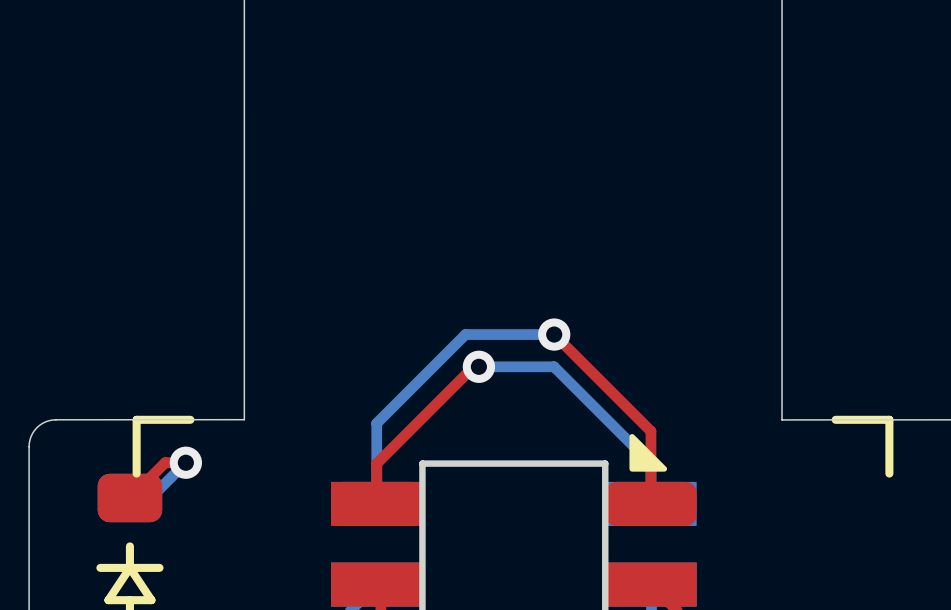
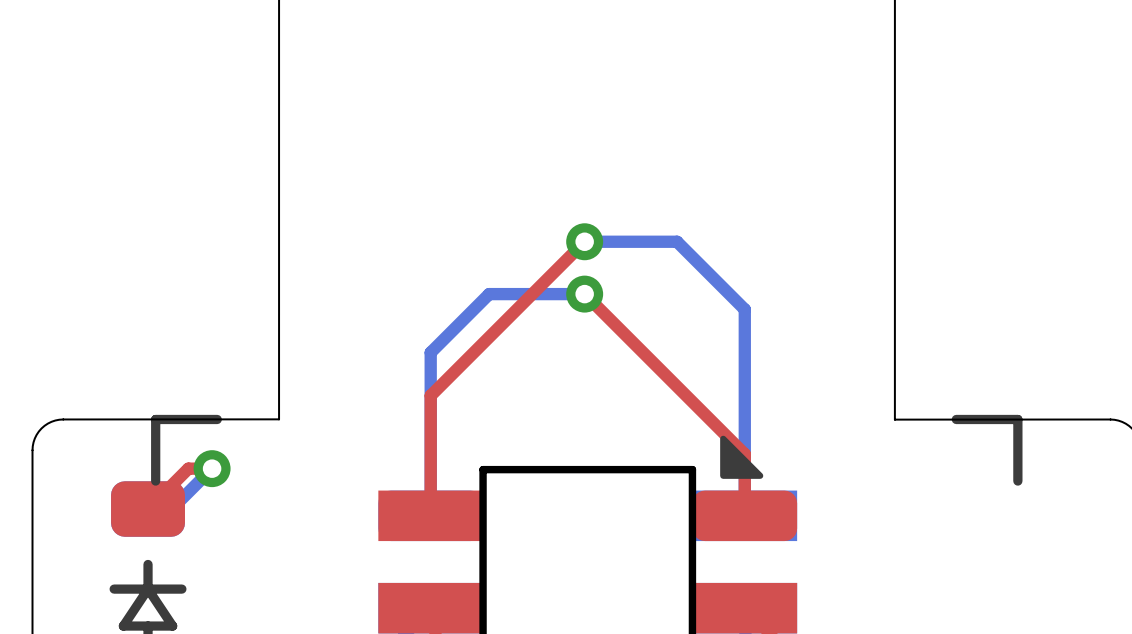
via: none -> (584, 241)
via: none -> (584, 294)
top track: (554, 334) (650, 431) (650, 450) -> (584, 294) (744, 454)
bottom track: (554, 334) (465, 334) (376, 423) -> (584, 294) (489, 294) (430, 352) (430, 423)
via: (554, 334) -> none
top track: (478, 366) (473, 366) (376, 463) -> (584, 241) (430, 395) (430, 469)
bottom track: (478, 366) (554, 366) (650, 463) -> (584, 241) (677, 241) (744, 309) (744, 469)
via: (478, 366) -> none

